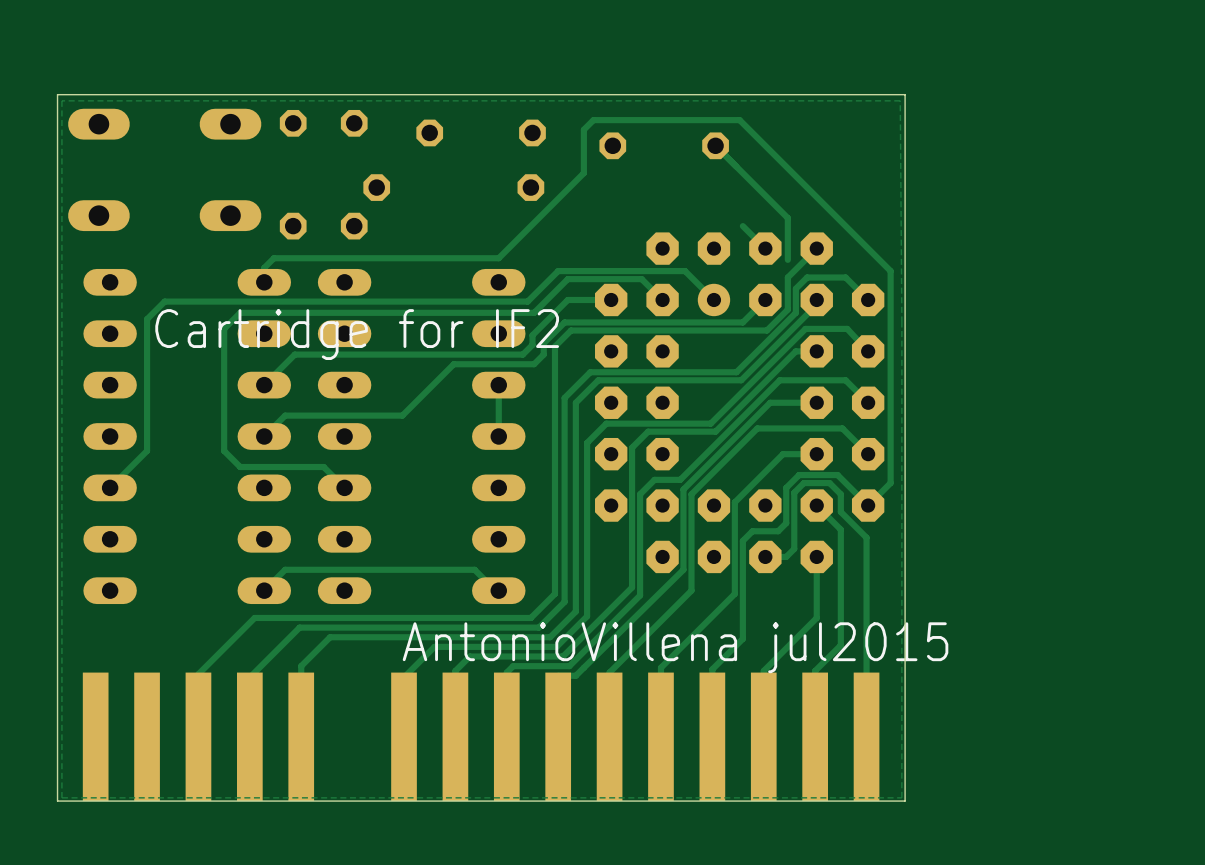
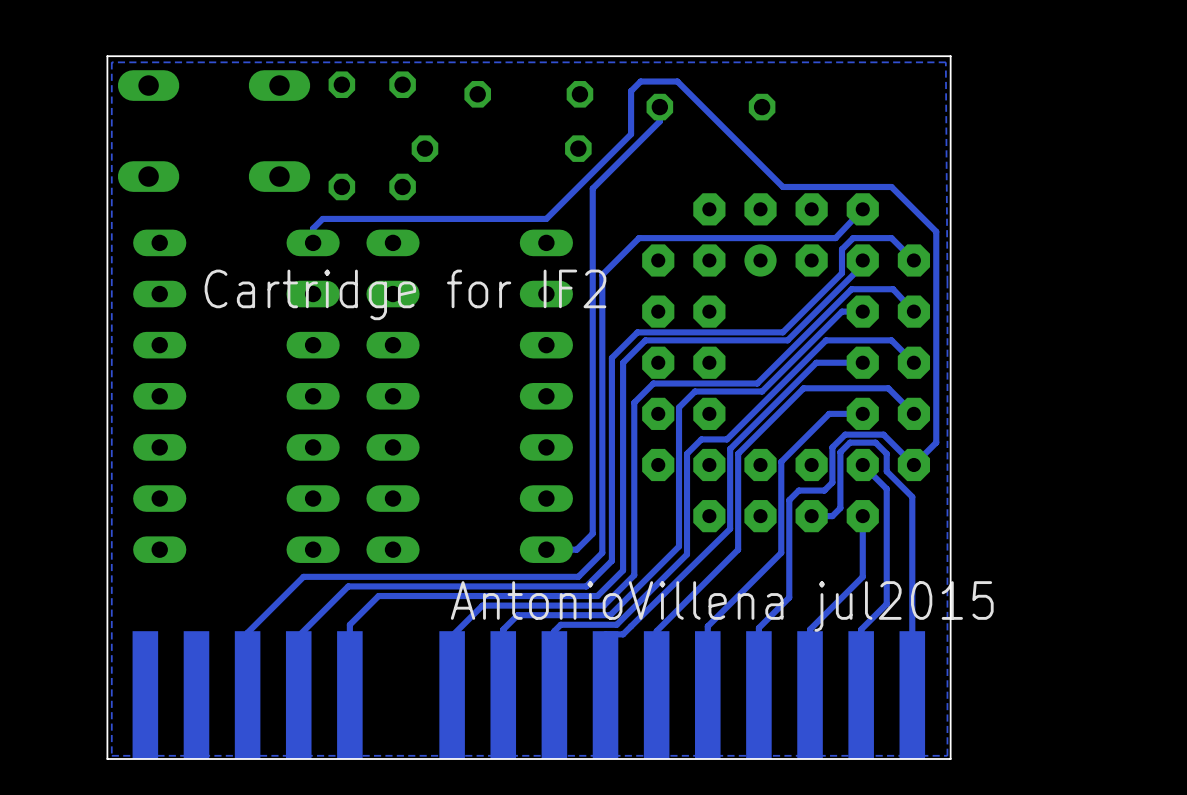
track: (630, 120) (739, 120) (845, 226) -> (677, 81) (782, 186) (891, 186)
track: (715, 145) (787, 218) (787, 259) -> none
track: (742, 226) (765, 248) -> none
track: (816, 248) (787, 277) (787, 309) (766, 330) (571, 330) (554, 346) -> (862, 209) (835, 238) (639, 238) (602, 274) (602, 306)
track: (611, 299) (567, 299) (532, 335) (532, 344) (522, 354) (294, 354) (264, 385) -> none
track: (662, 299) (641, 279) (567, 279) (534, 312) (240, 312) (224, 328) (224, 450) (240, 467) (323, 467) (344, 487) -> none
track: (713, 299) (685, 271) (558, 271) (527, 301) (164, 301) (147, 319) (147, 450) (110, 487) -> none
track: (765, 299) (742, 322) (564, 322) (543, 343) (543, 354) (534, 364) (453, 364) (402, 415) (285, 415) (264, 436) -> none
track: (498, 385) (498, 436) -> none
track: (498, 590) (495, 590) (474, 569) (285, 569) (264, 590) -> (546, 549) (576, 549) (592, 533) (592, 188) (659, 121) (659, 107)

